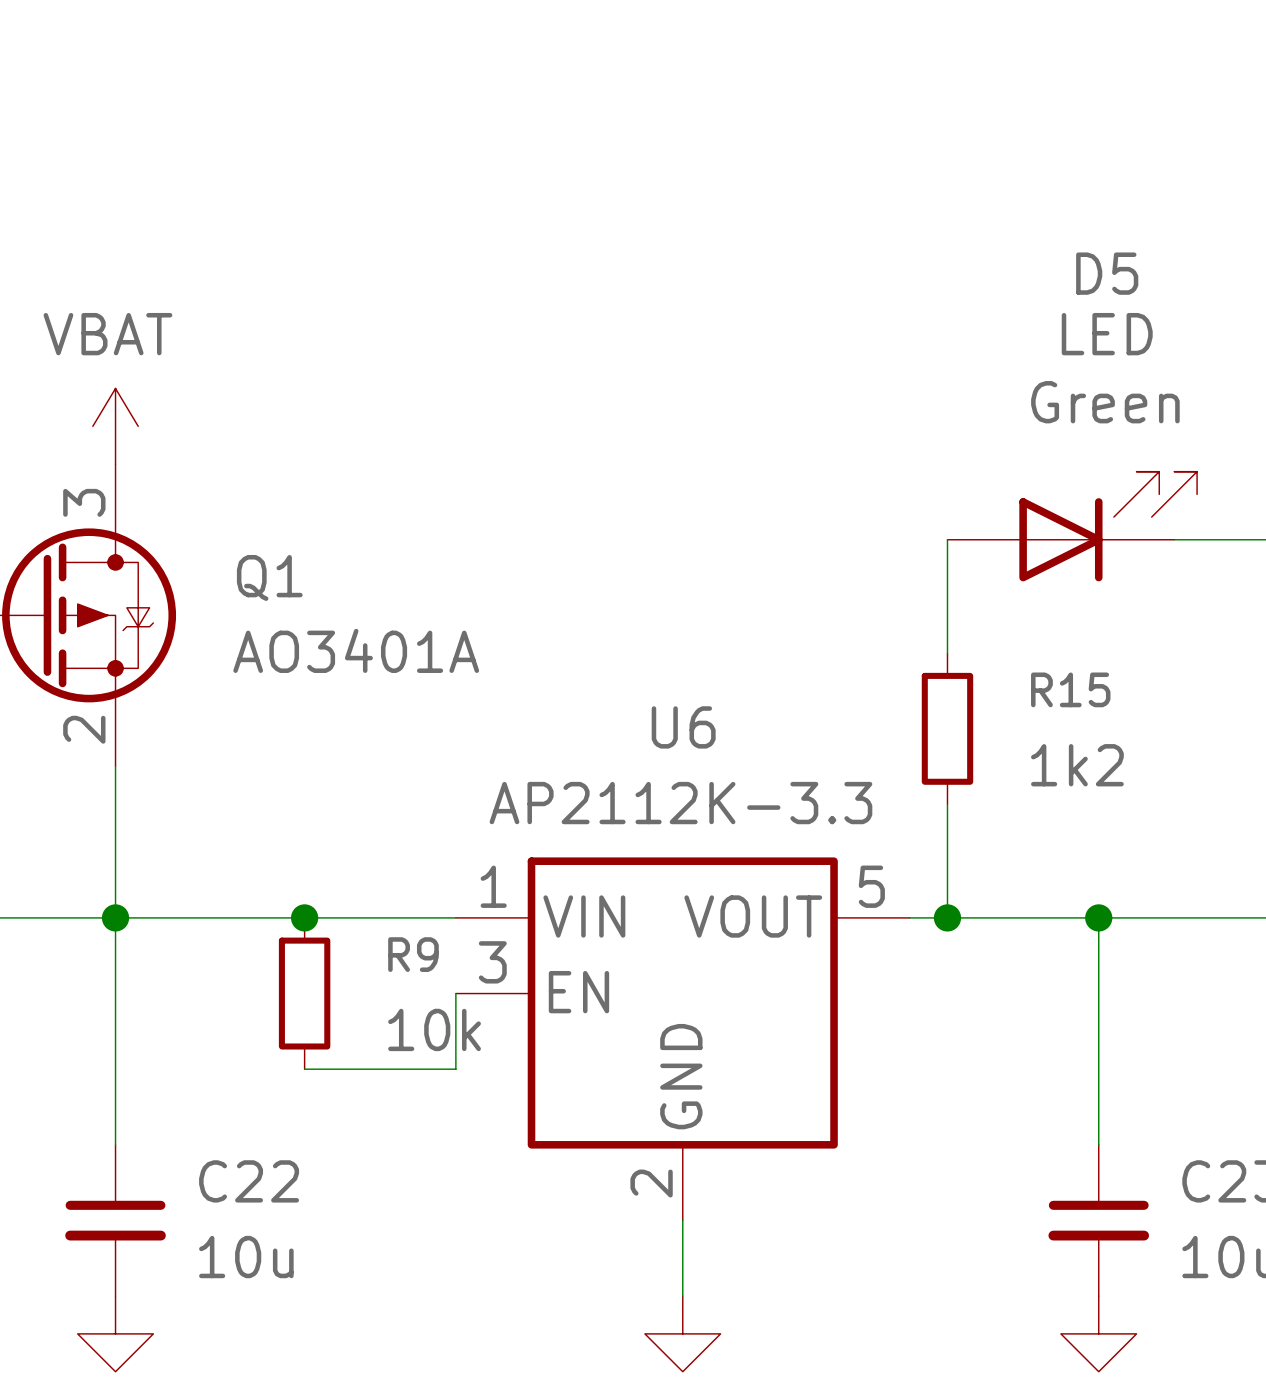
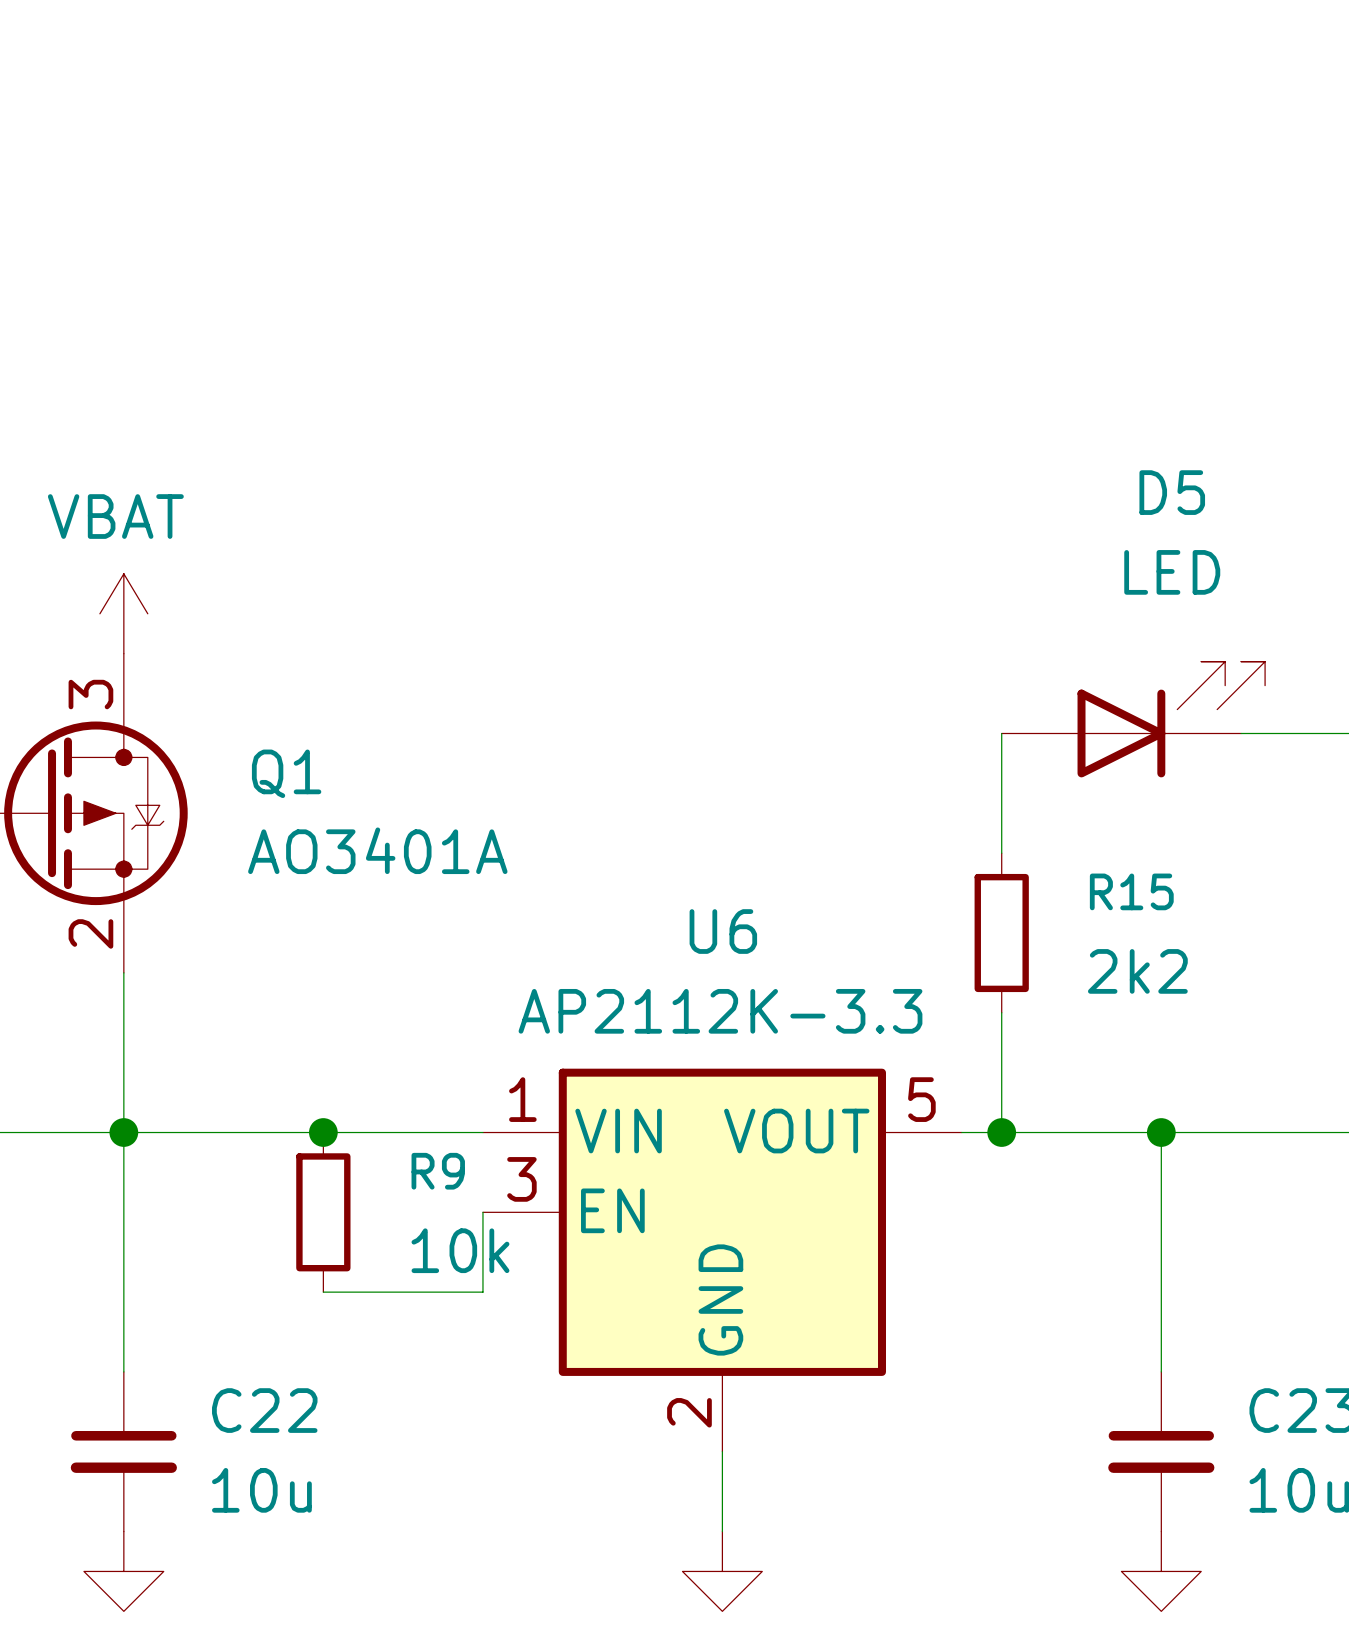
D5 name position: D5 (1107, 273) -> D5 (1172, 492)
D5 value position: LED (1107, 334) -> LED (1172, 572)
D5 text: Green (1105, 402) -> none
R15 value: 1k2 (1077, 765) -> 2k2 (1137, 971)

